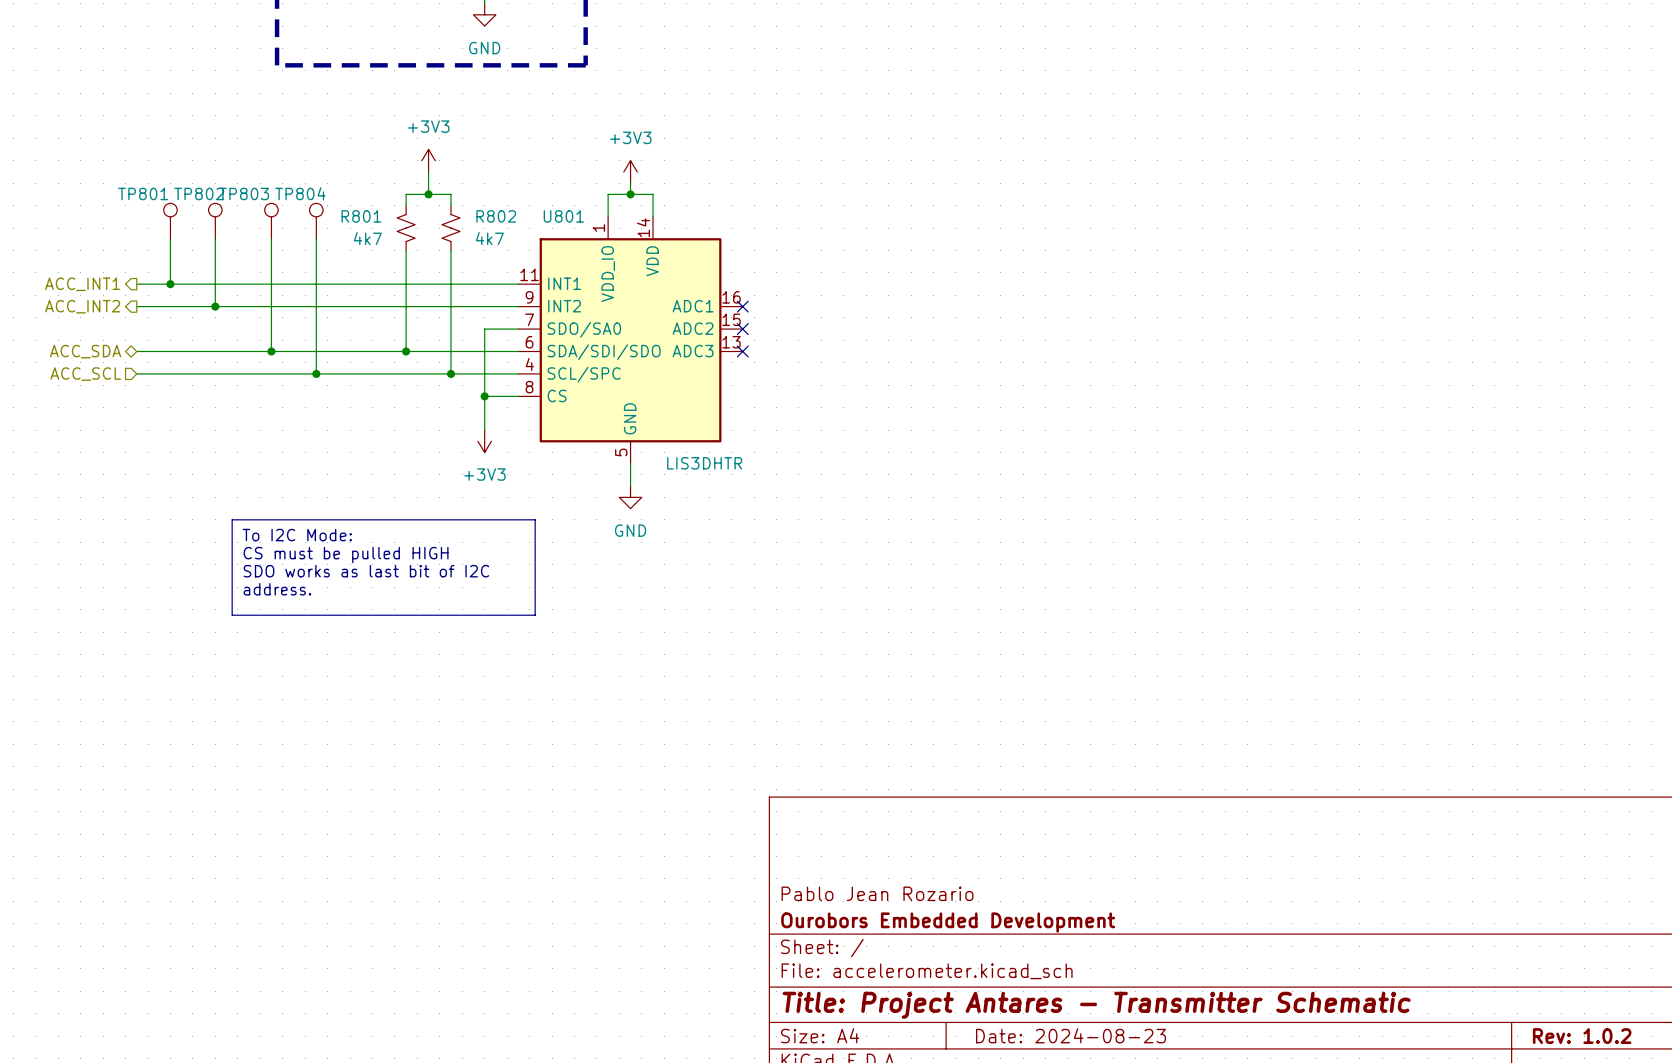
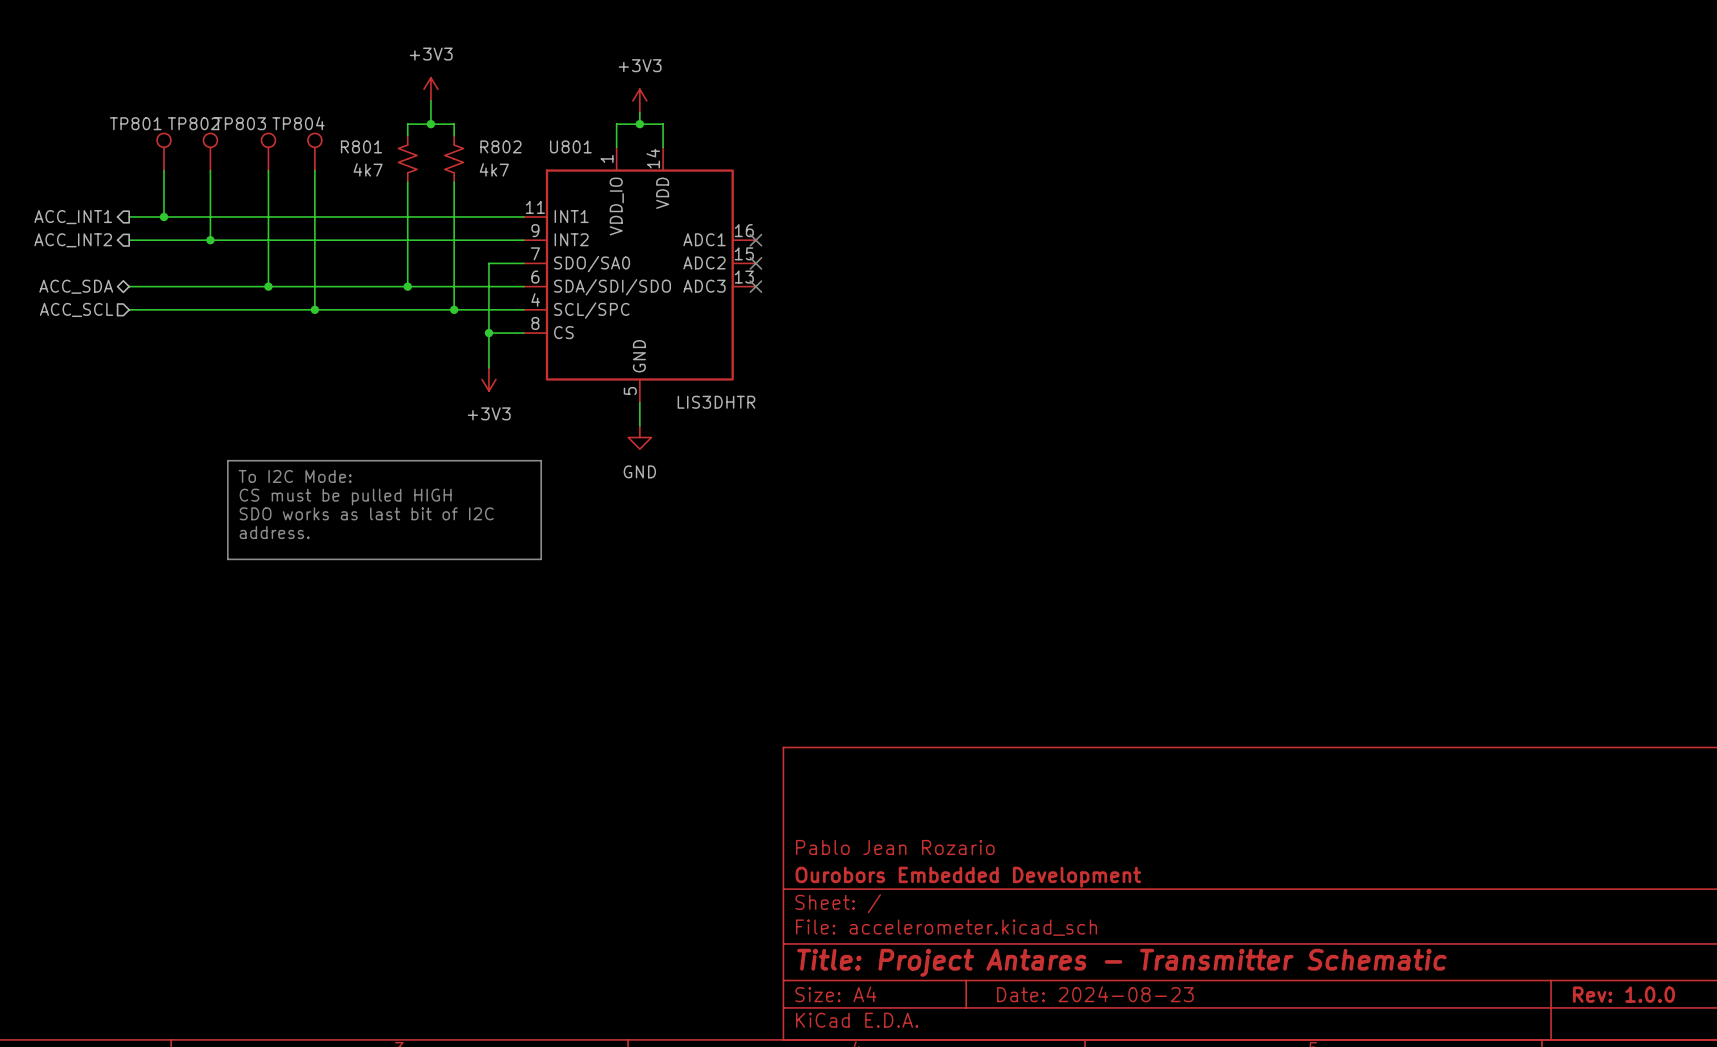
title block: Rev: 1.0.2 (1582, 1036) -> Rev: 1.0.0 (1624, 994)

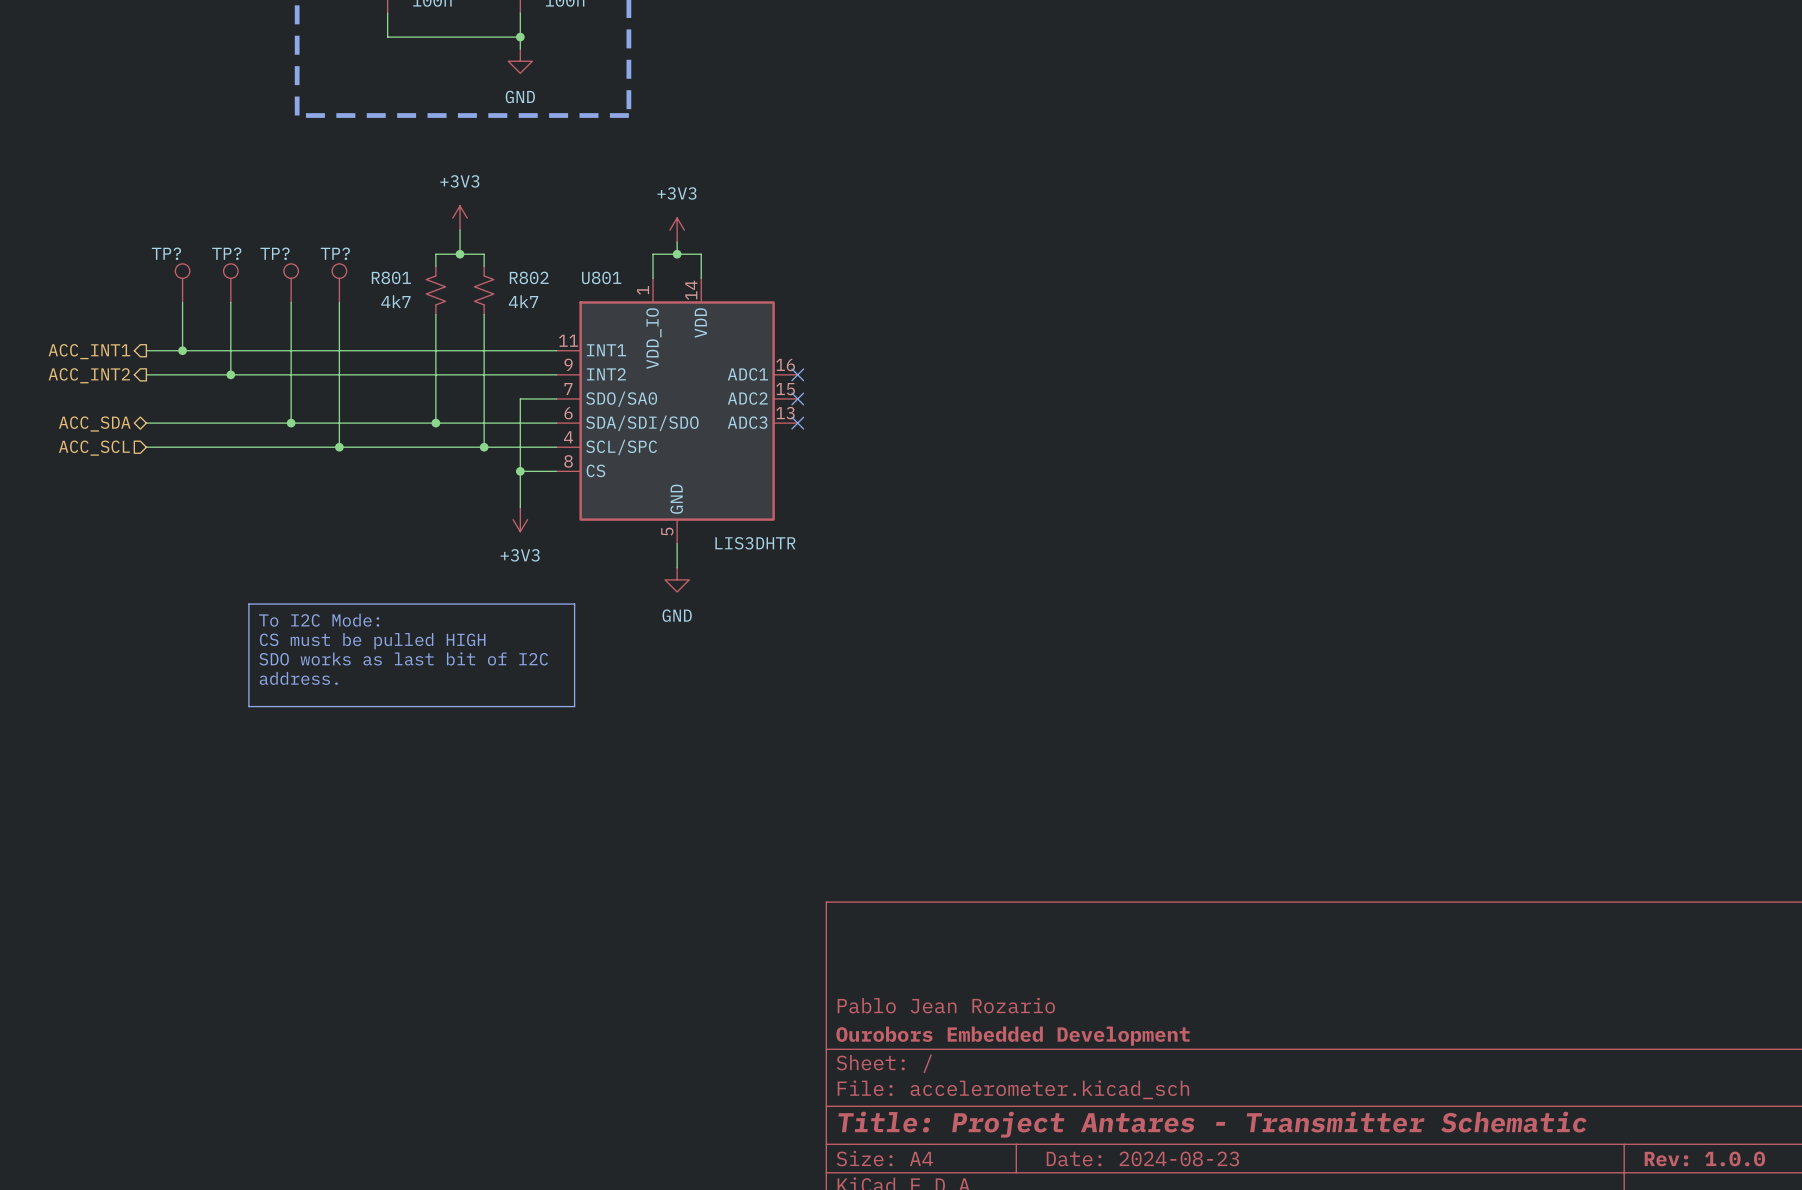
TP801 name: TP801 (135, 123) -> TP? (166, 253)
TP802 name: TP802 (193, 123) -> TP? (226, 253)
TP803 name: TP803 (240, 123) -> TP? (275, 253)
TP804 name: TP804 (298, 123) -> TP? (335, 253)

